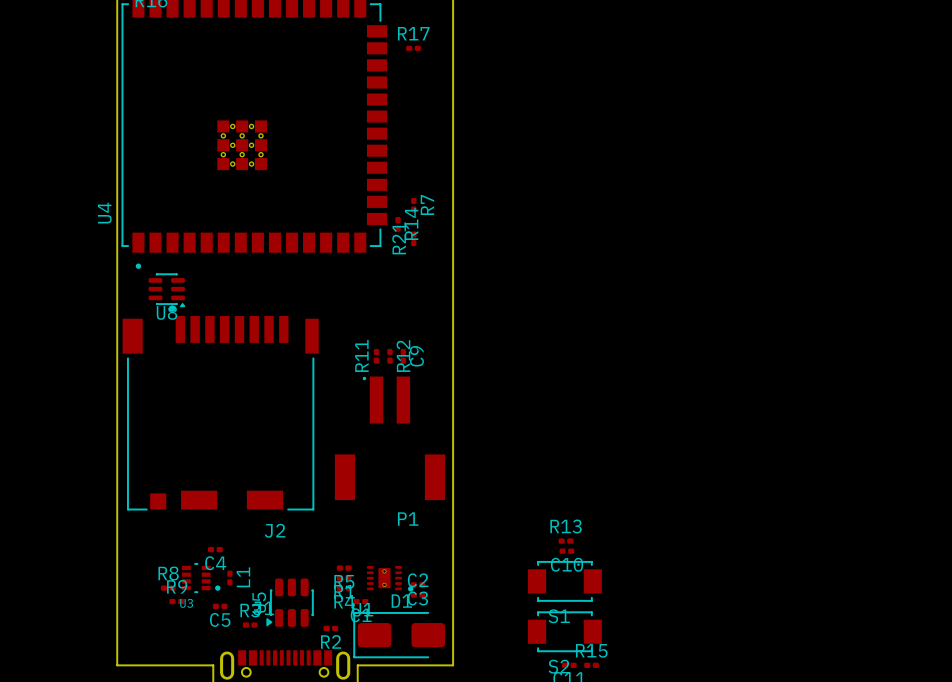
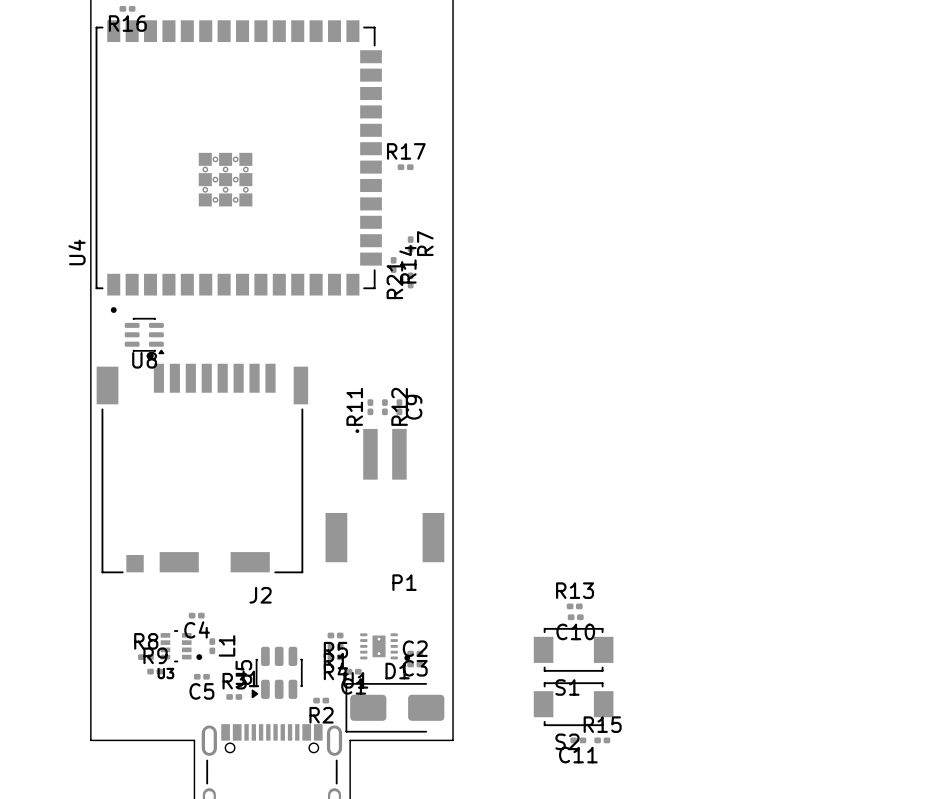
R17 position: (413, 48) -> (405, 167)

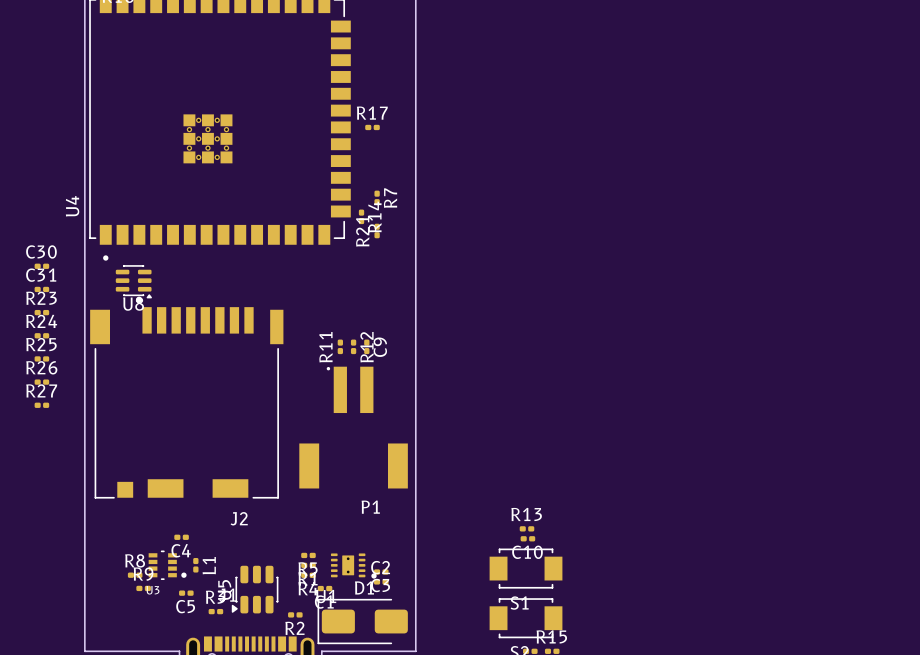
C30: none -> (41, 266)
C31: none -> (41, 289)
R23: none -> (41, 312)
R24: none -> (41, 335)
R25: none -> (41, 358)
R26: none -> (41, 382)
R27: none -> (41, 405)

